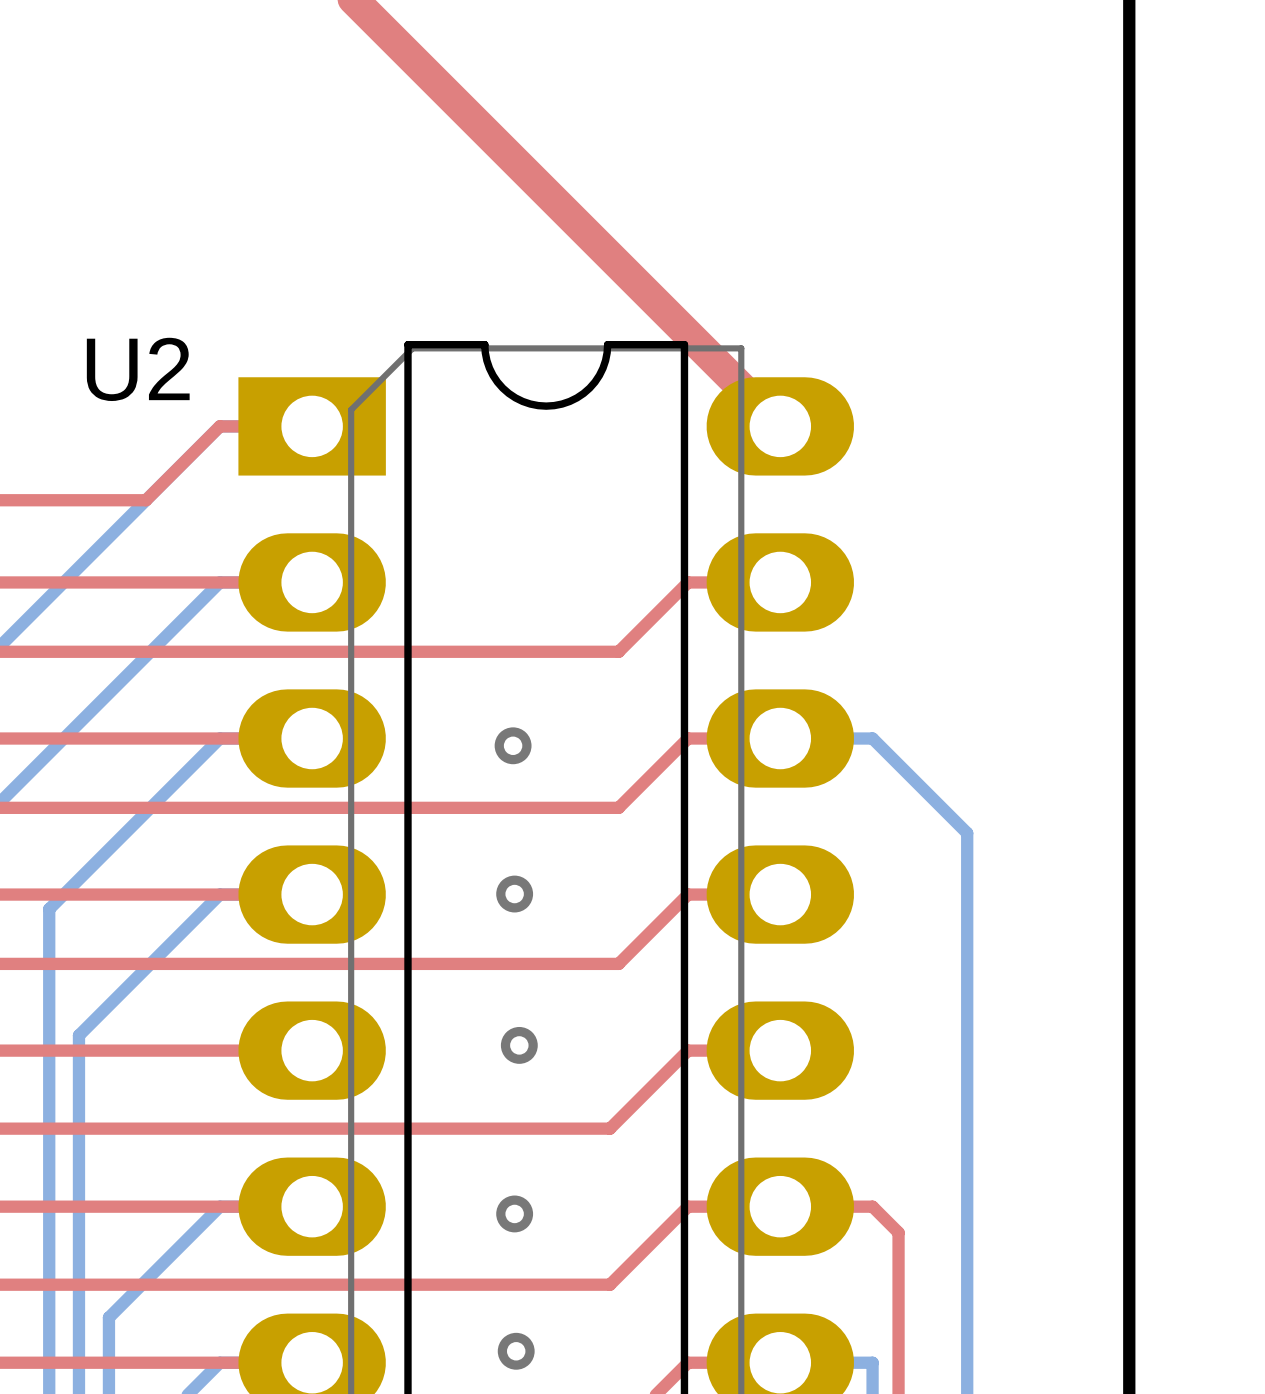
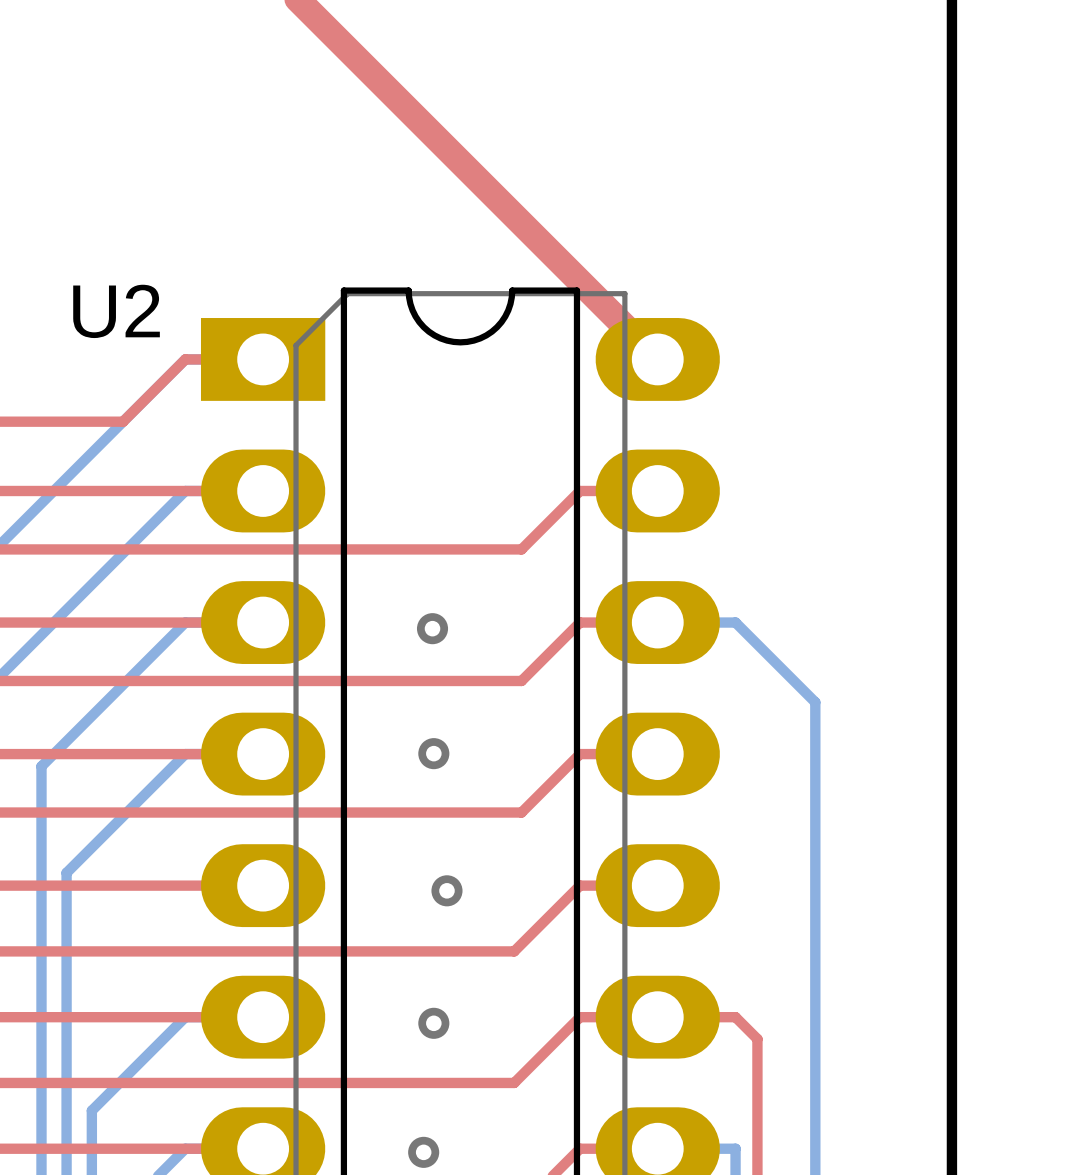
via position: (519, 1045) -> (446, 890)
via position: (516, 1351) -> (423, 1152)

